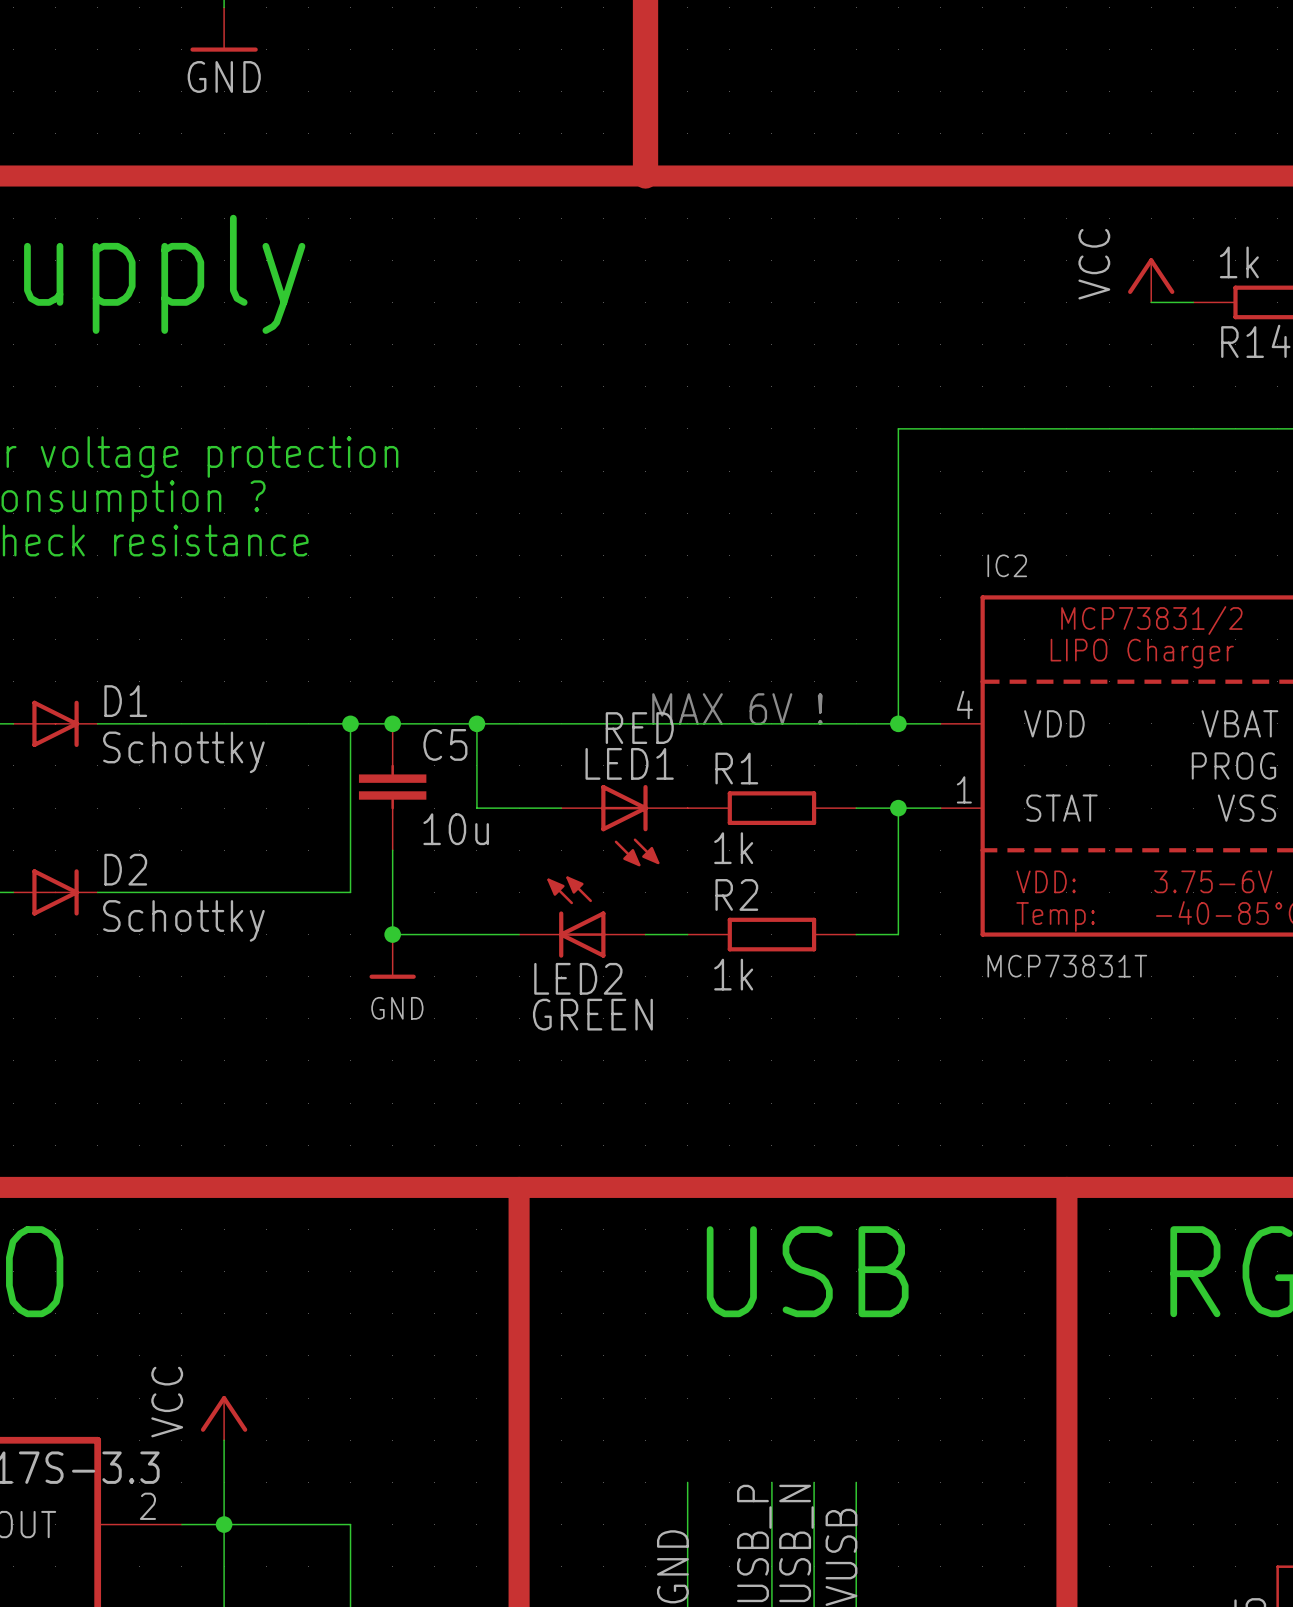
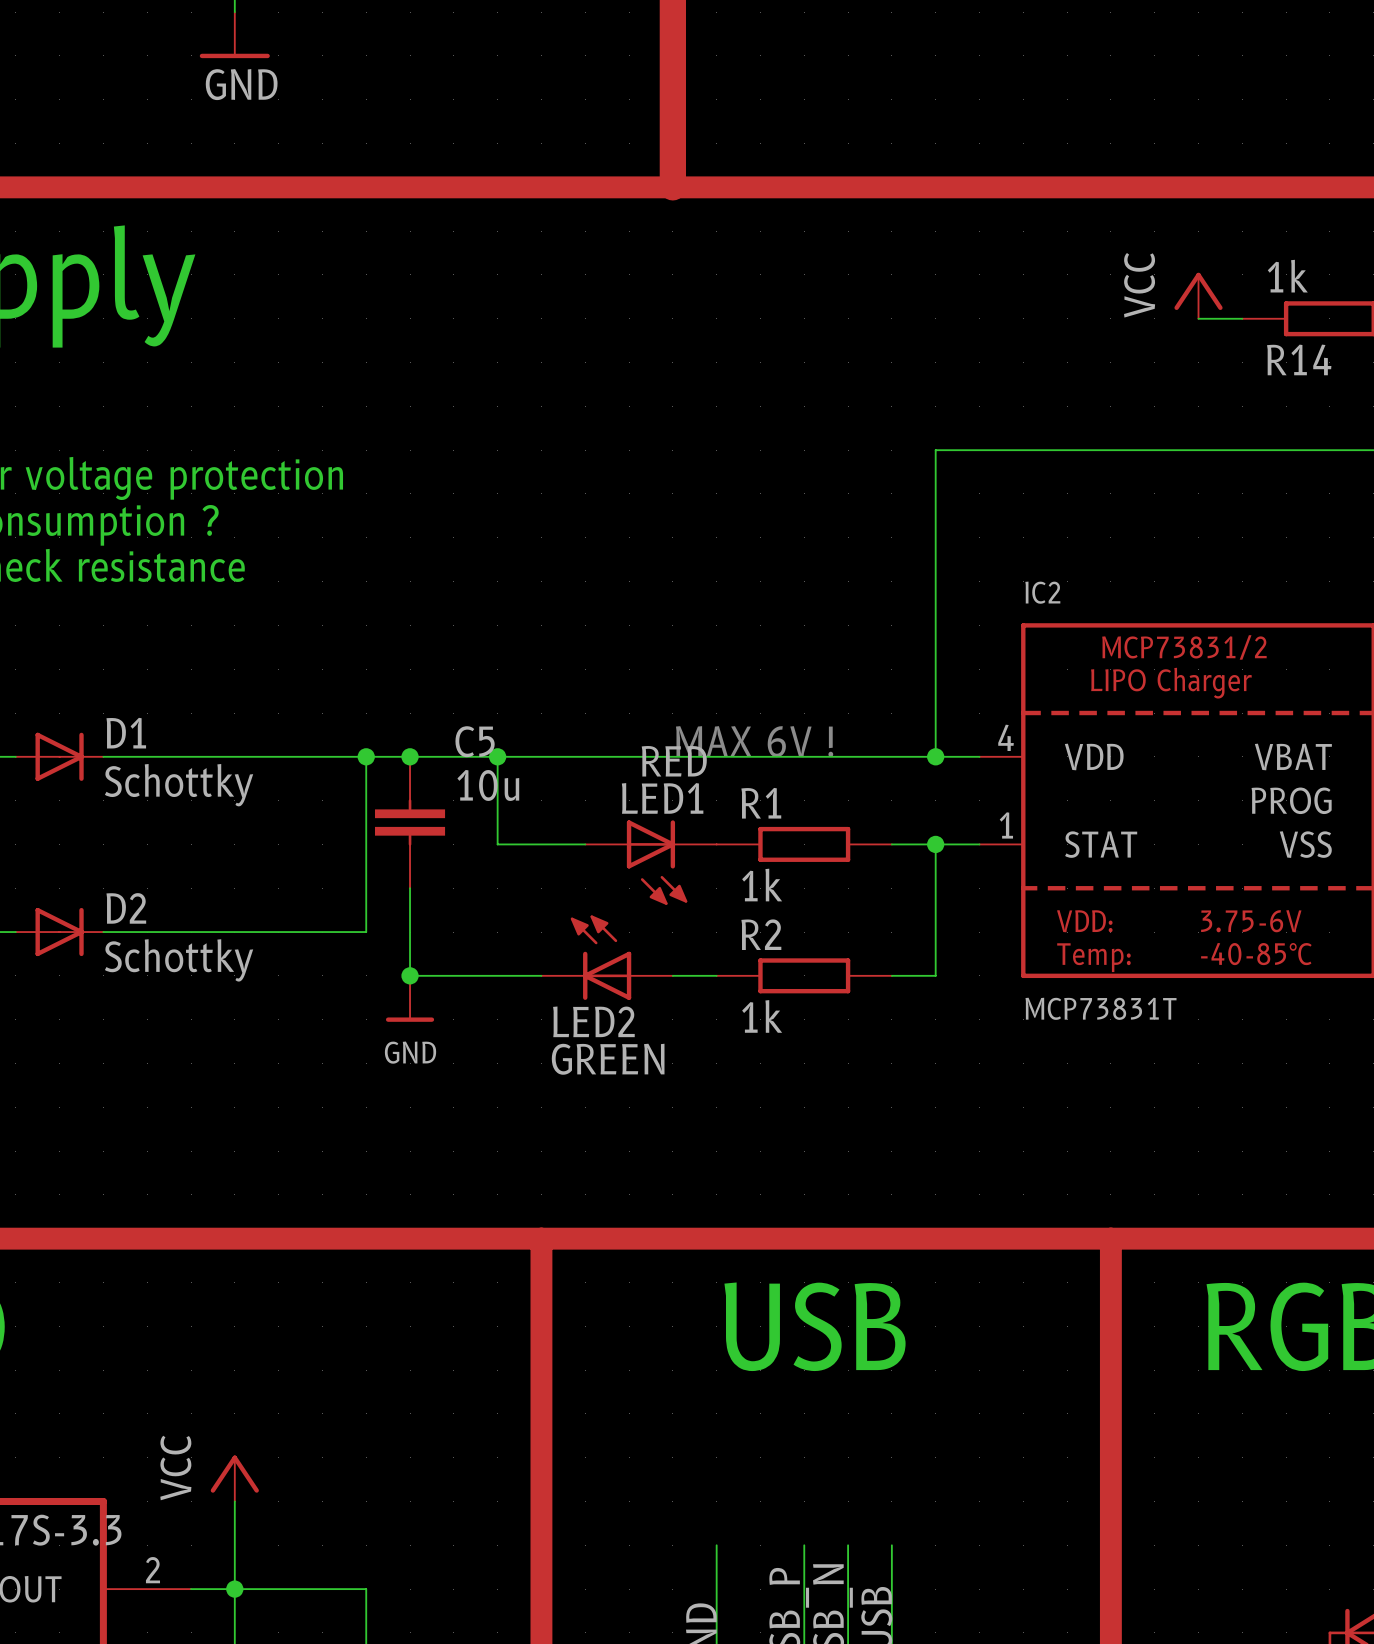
C5 name position: C5 (445, 744) -> C5 (475, 741)
C5 value position: 10u (456, 829) -> 10u (488, 785)

